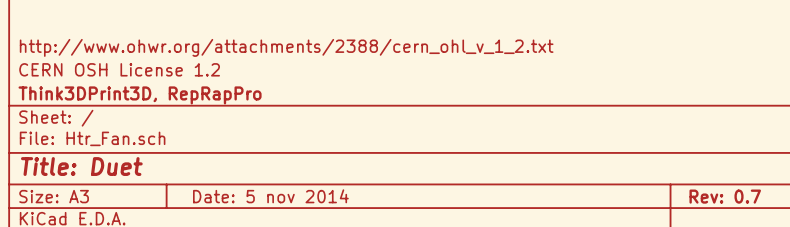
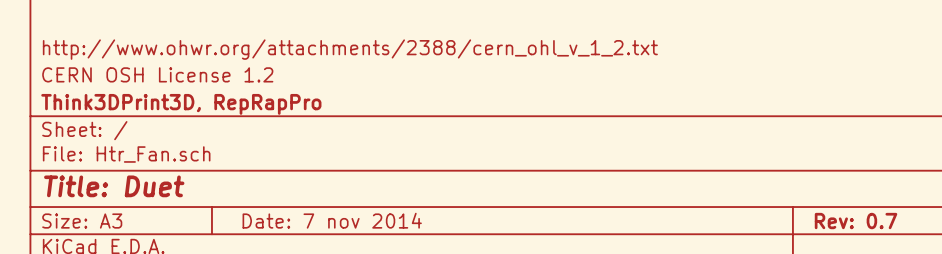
title block: Date: 5 nov 2014 (270, 196) -> Date: 7 nov 2014 (332, 220)

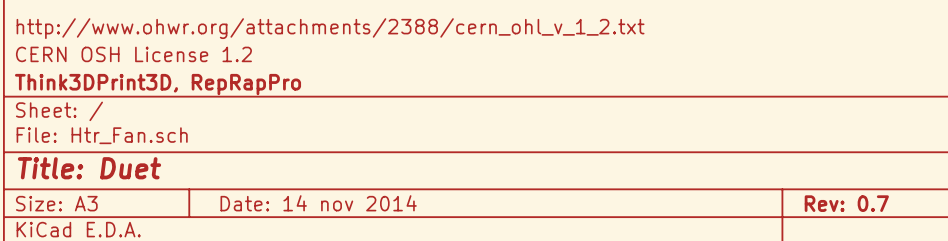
title block: Date: 7 nov 2014 (332, 220) -> Date: 14 nov 2014 (318, 203)

